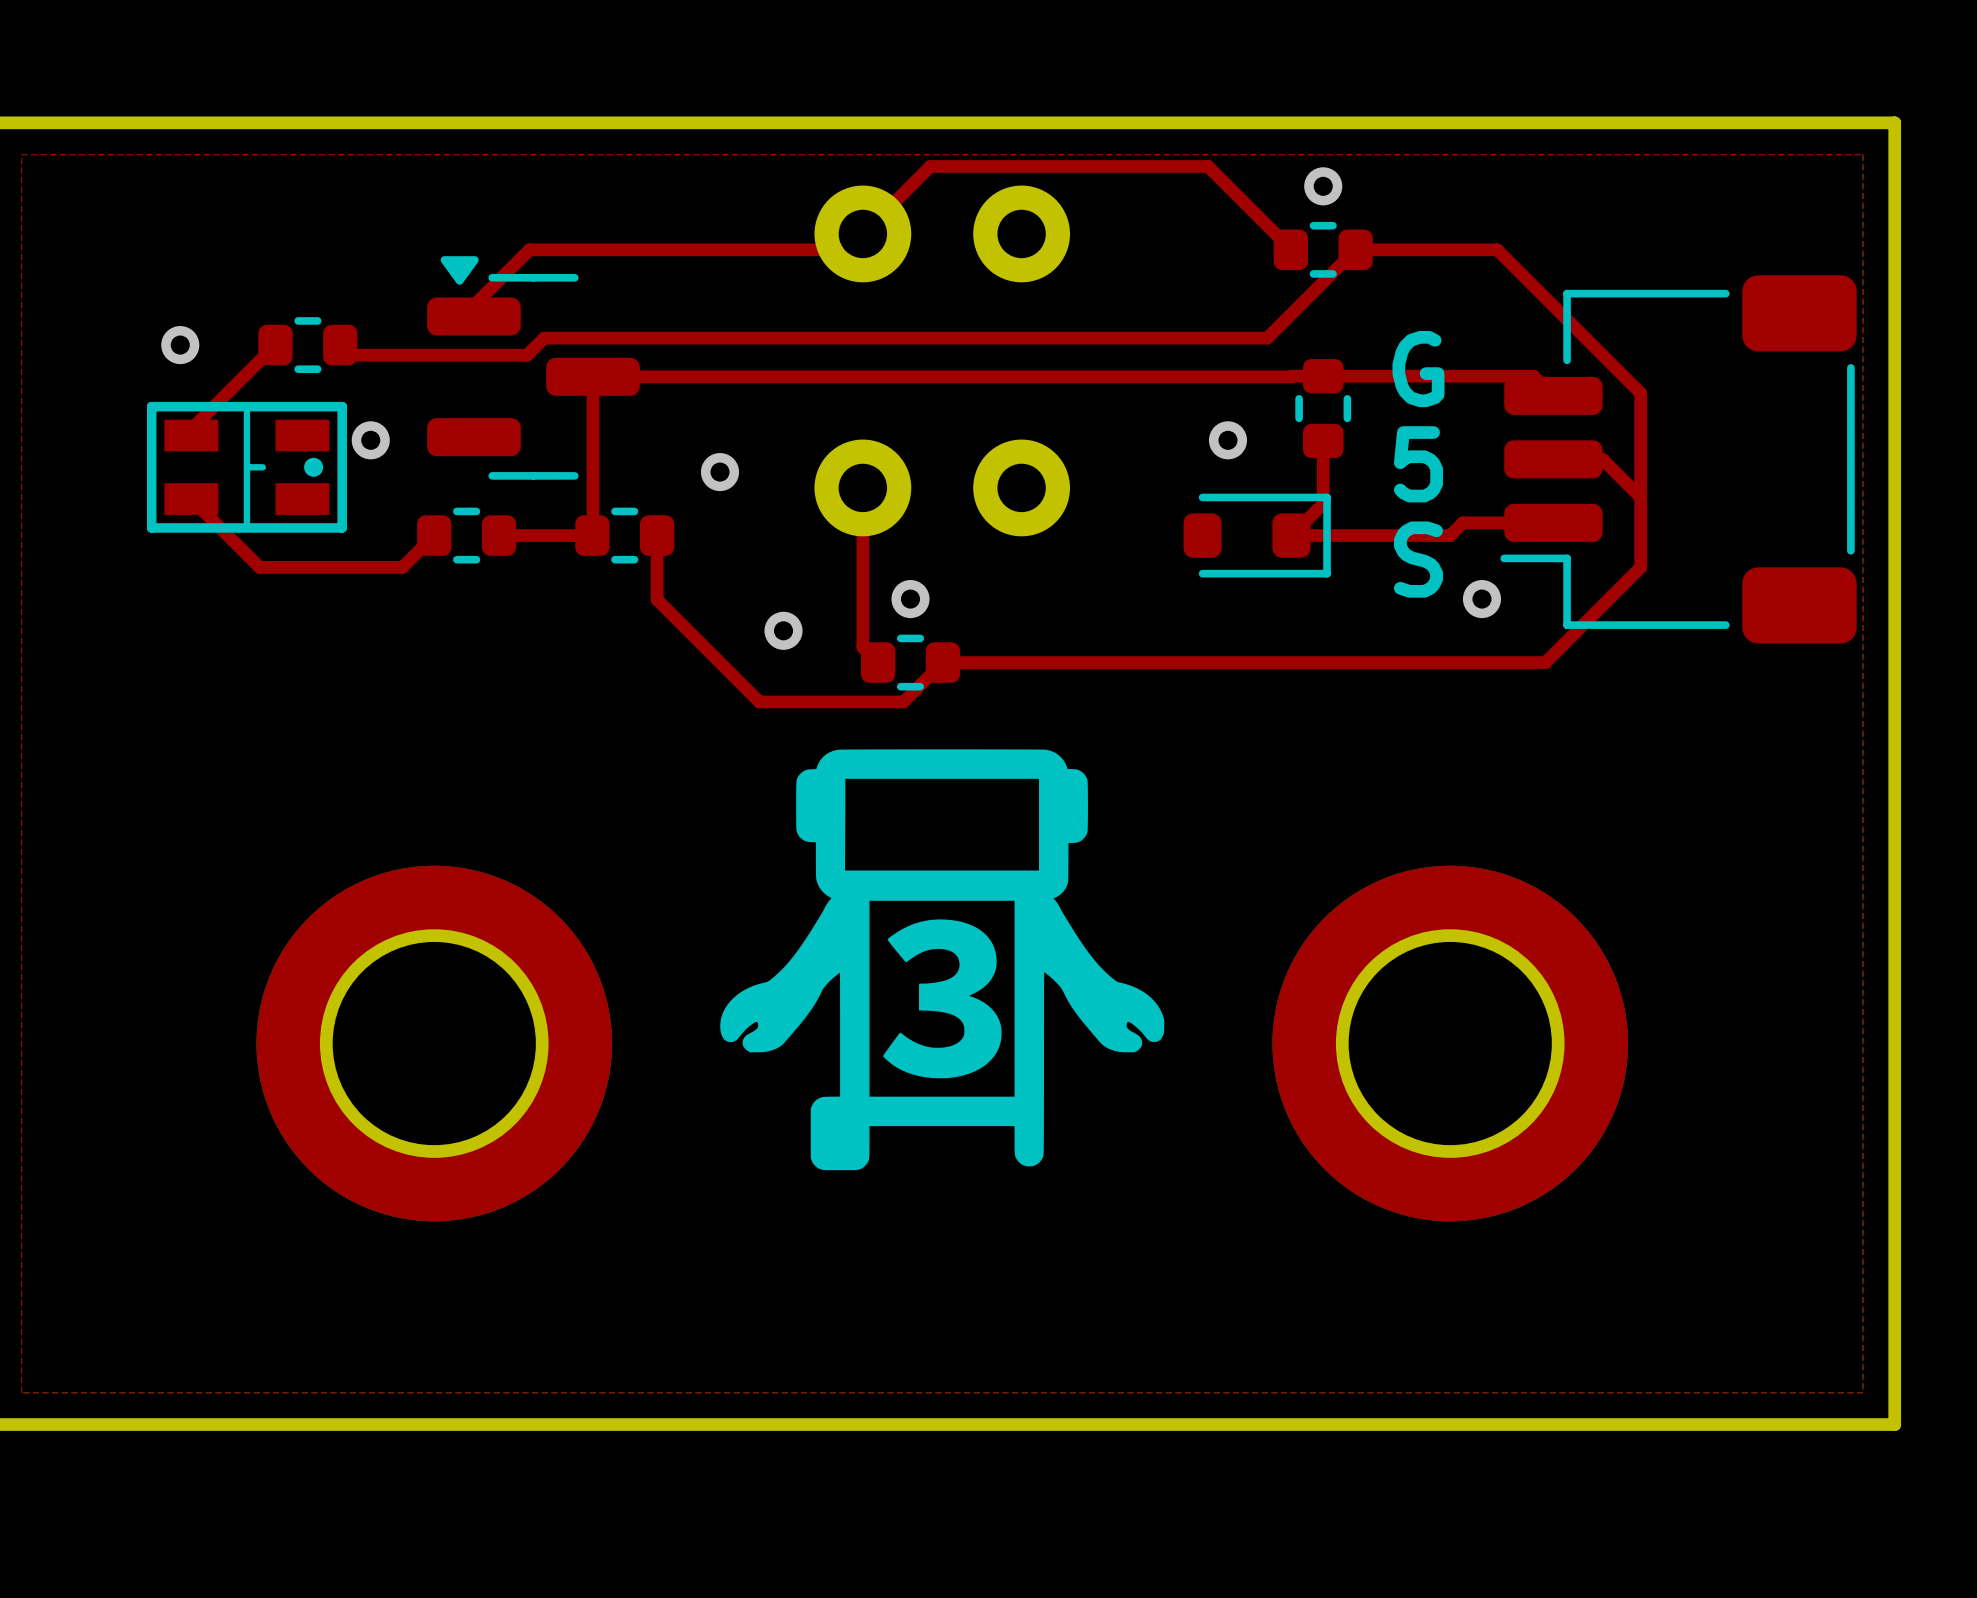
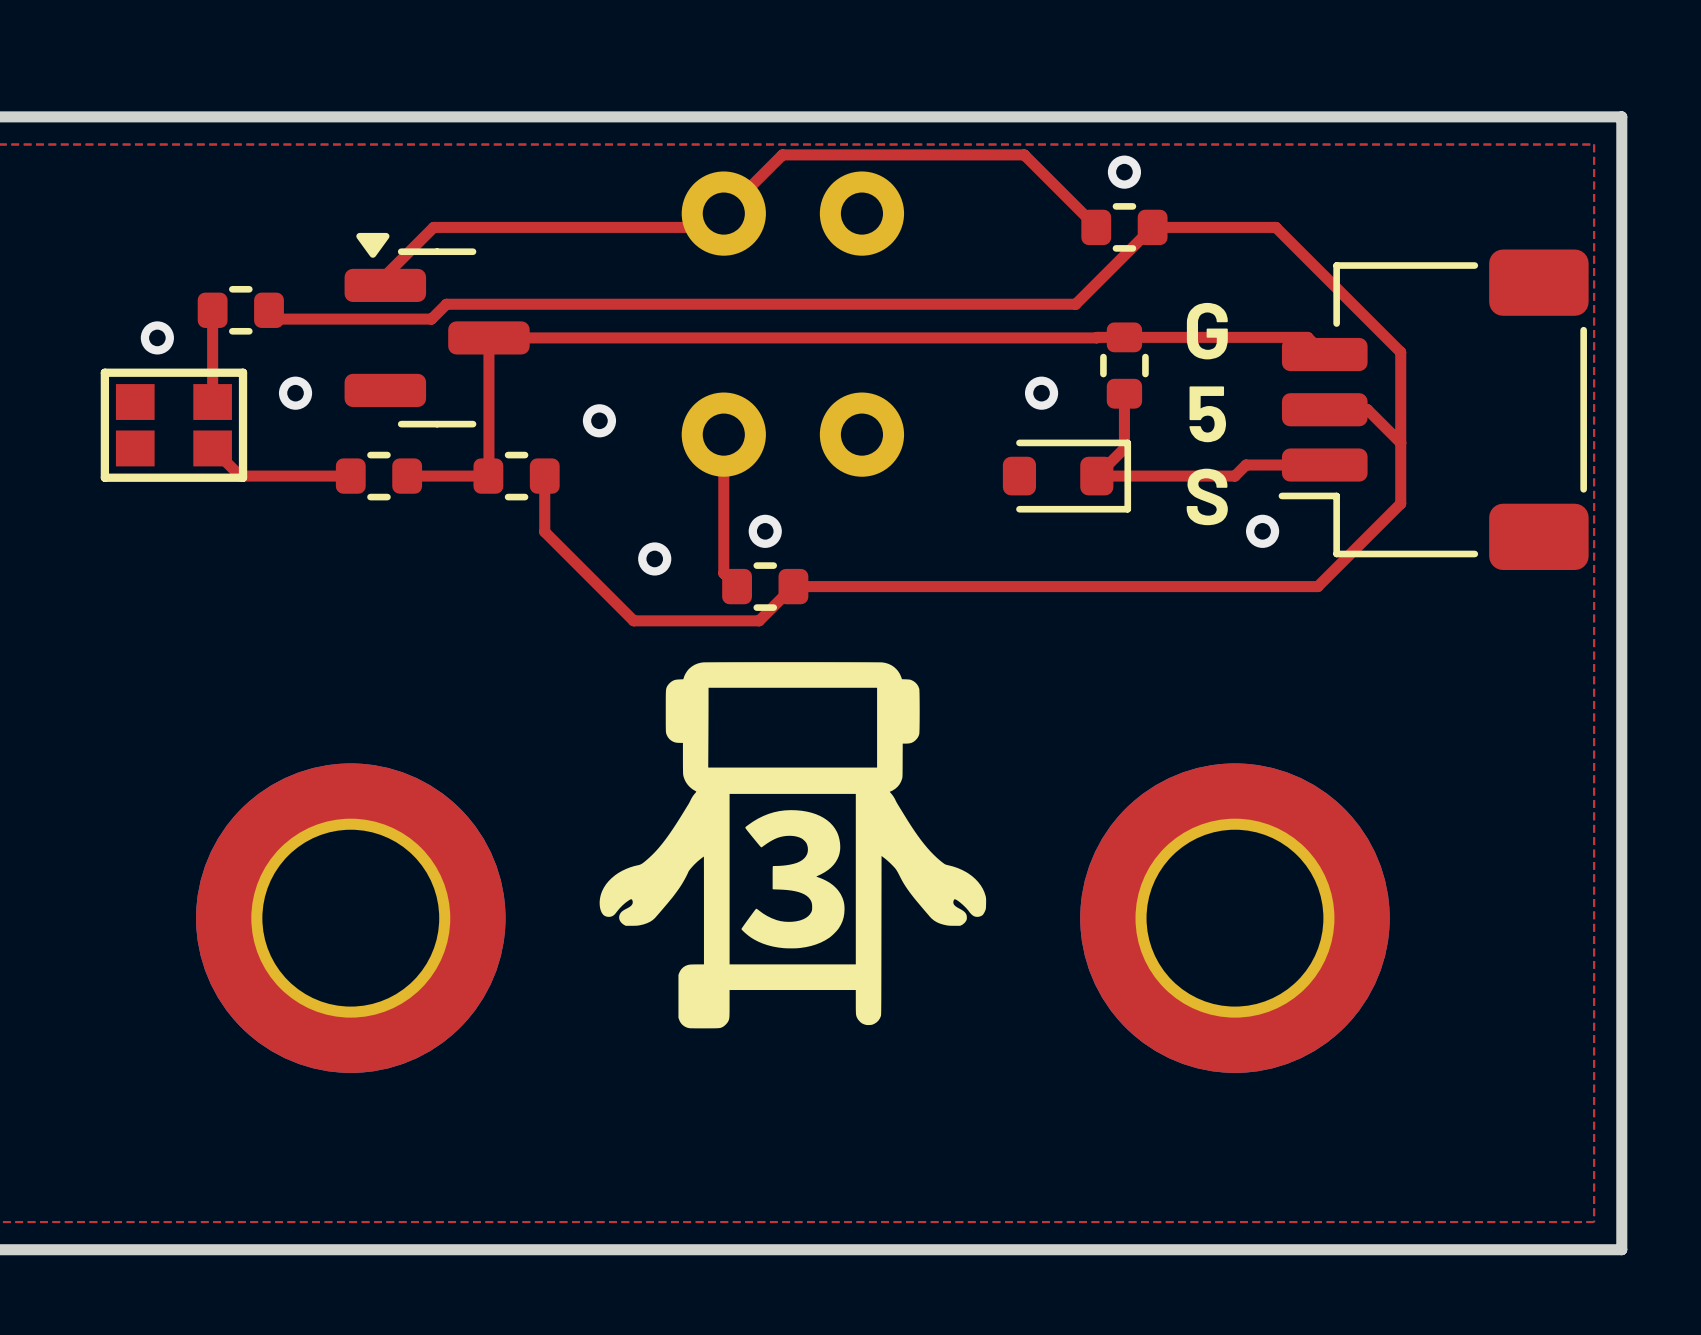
via position: (180, 345) -> (157, 337)
top track: (275, 345) (191, 429) (191, 435) -> (212, 310) (212, 402)
part footprint: [146, 401, 347, 533] -> [100, 368, 248, 482]
top track: (191, 499) (259, 567) (402, 567) (434, 535) -> (212, 448) (240, 476) (350, 476)

